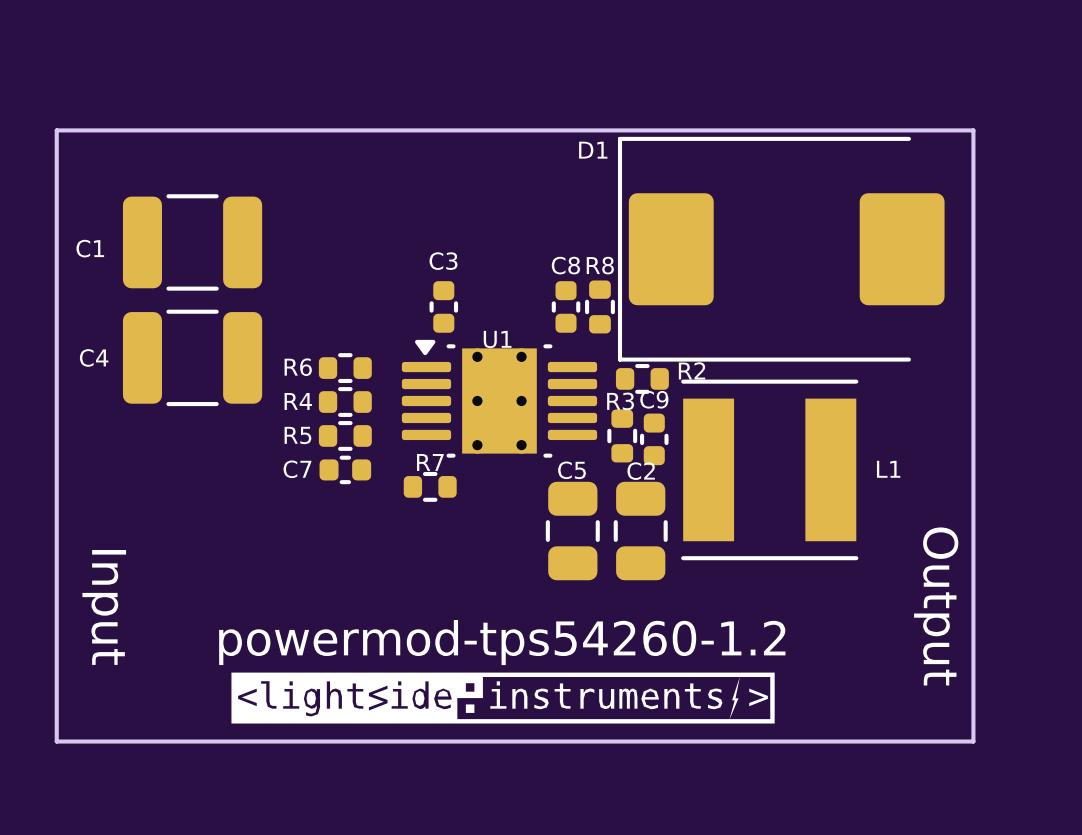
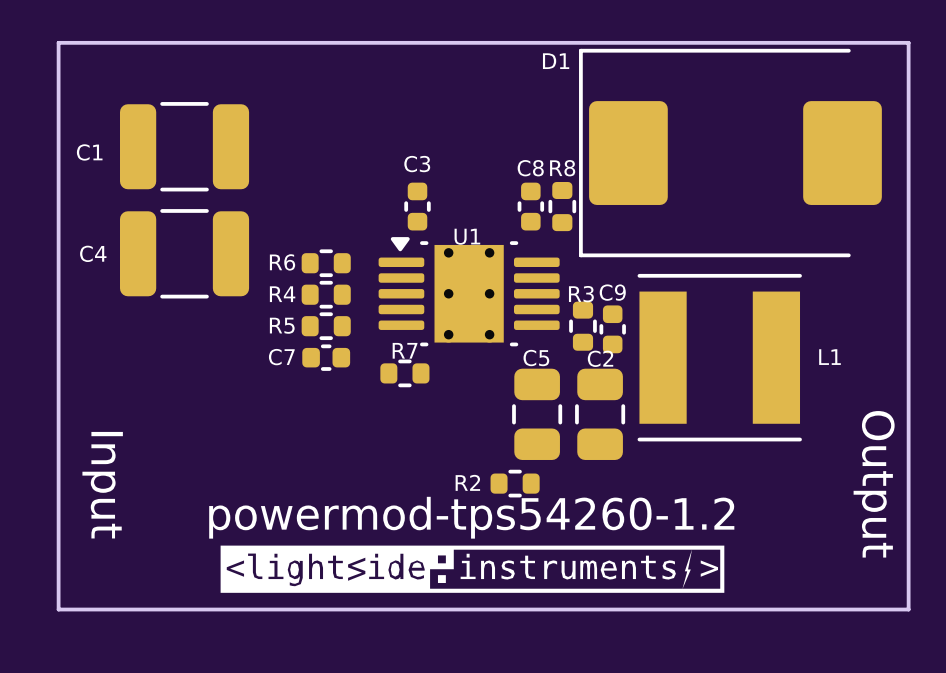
R2 name position: R2 (692, 370) -> R2 (467, 482)
R2 position: (642, 378) -> (515, 483)

